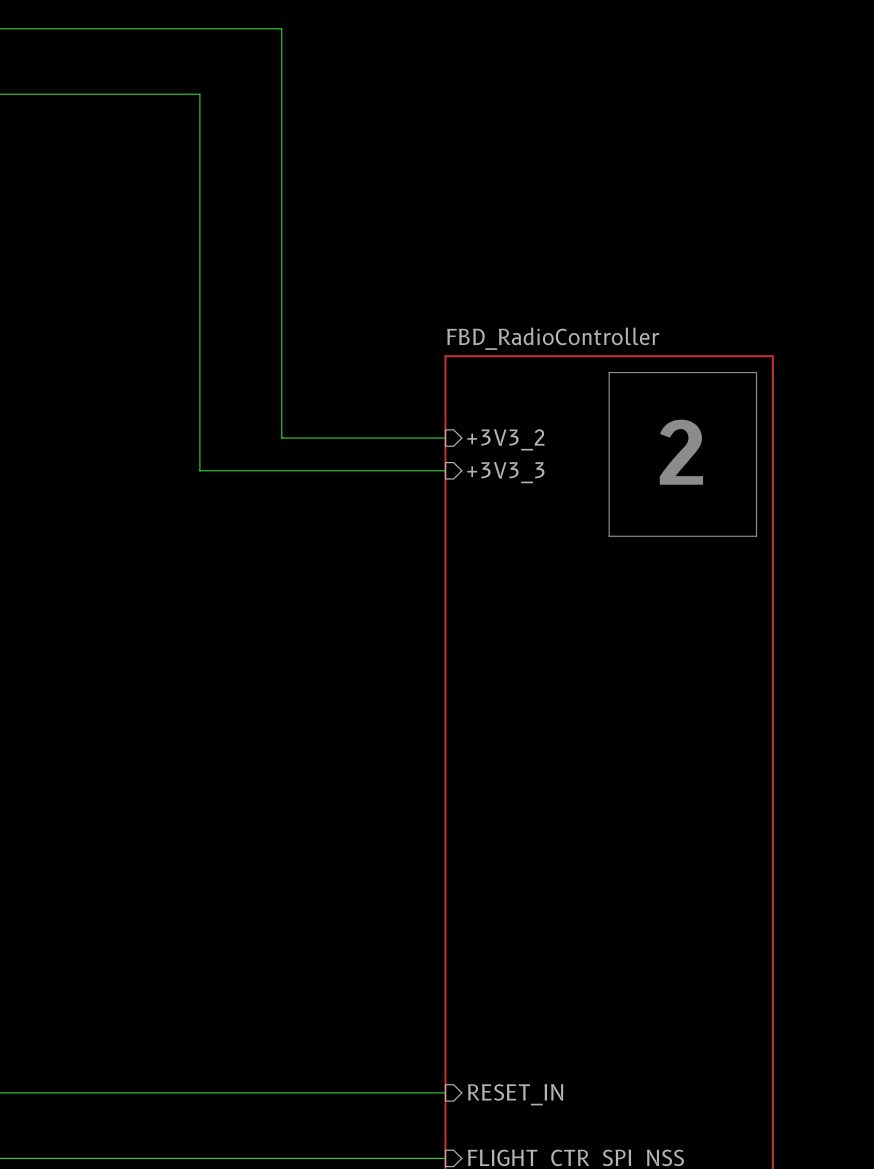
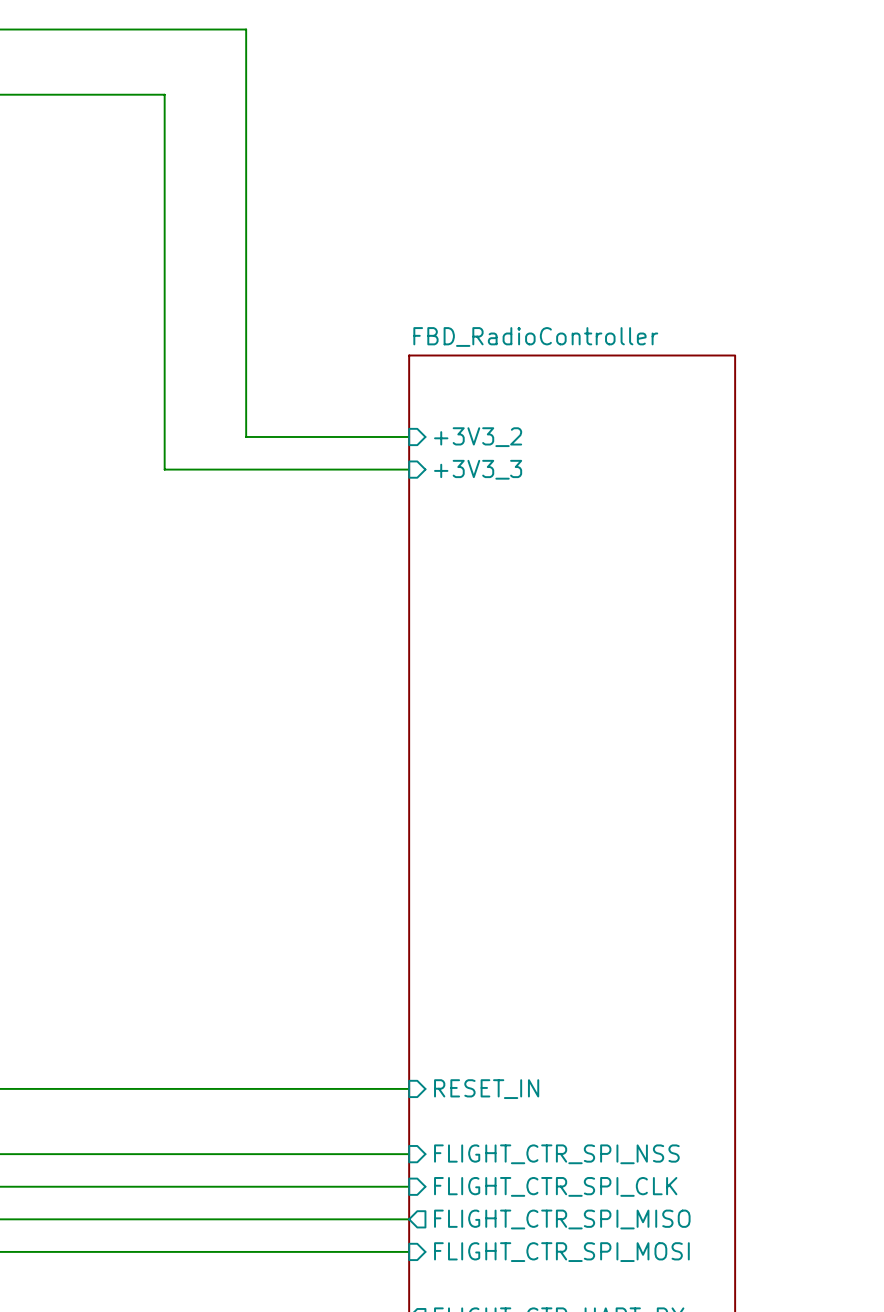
line: (609, 372) (756, 372) (756, 536) (609, 536) (609, 372) -> none
text: 2 (681, 452) -> none

